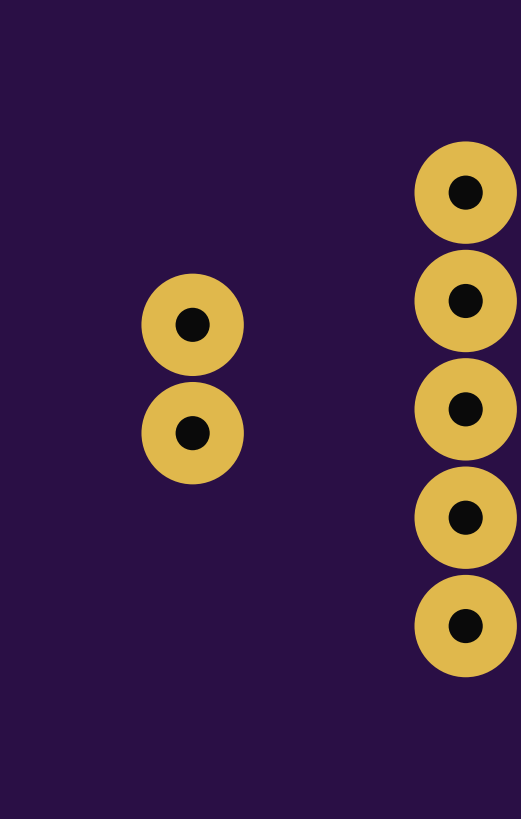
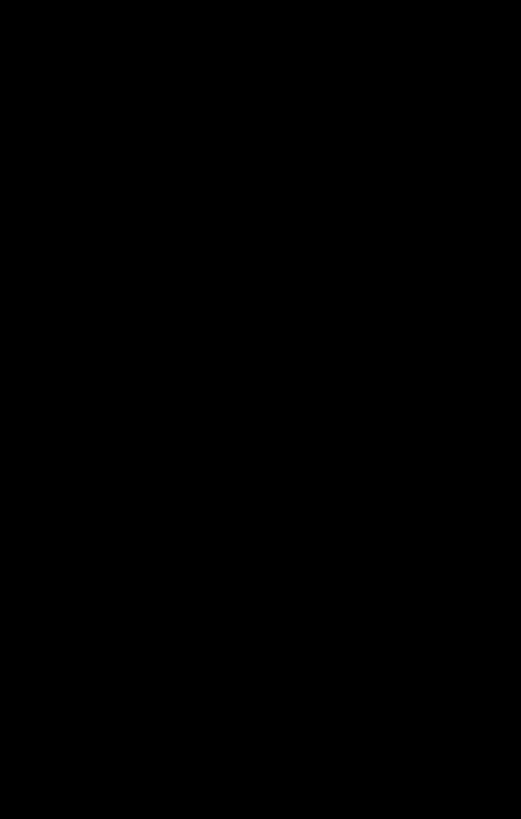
part: (465, 192) -> none
part: (465, 300) -> none
part: (192, 324) -> none
part: (465, 409) -> none
part: (192, 433) -> none
part: (465, 517) -> none
part: (465, 626) -> none

